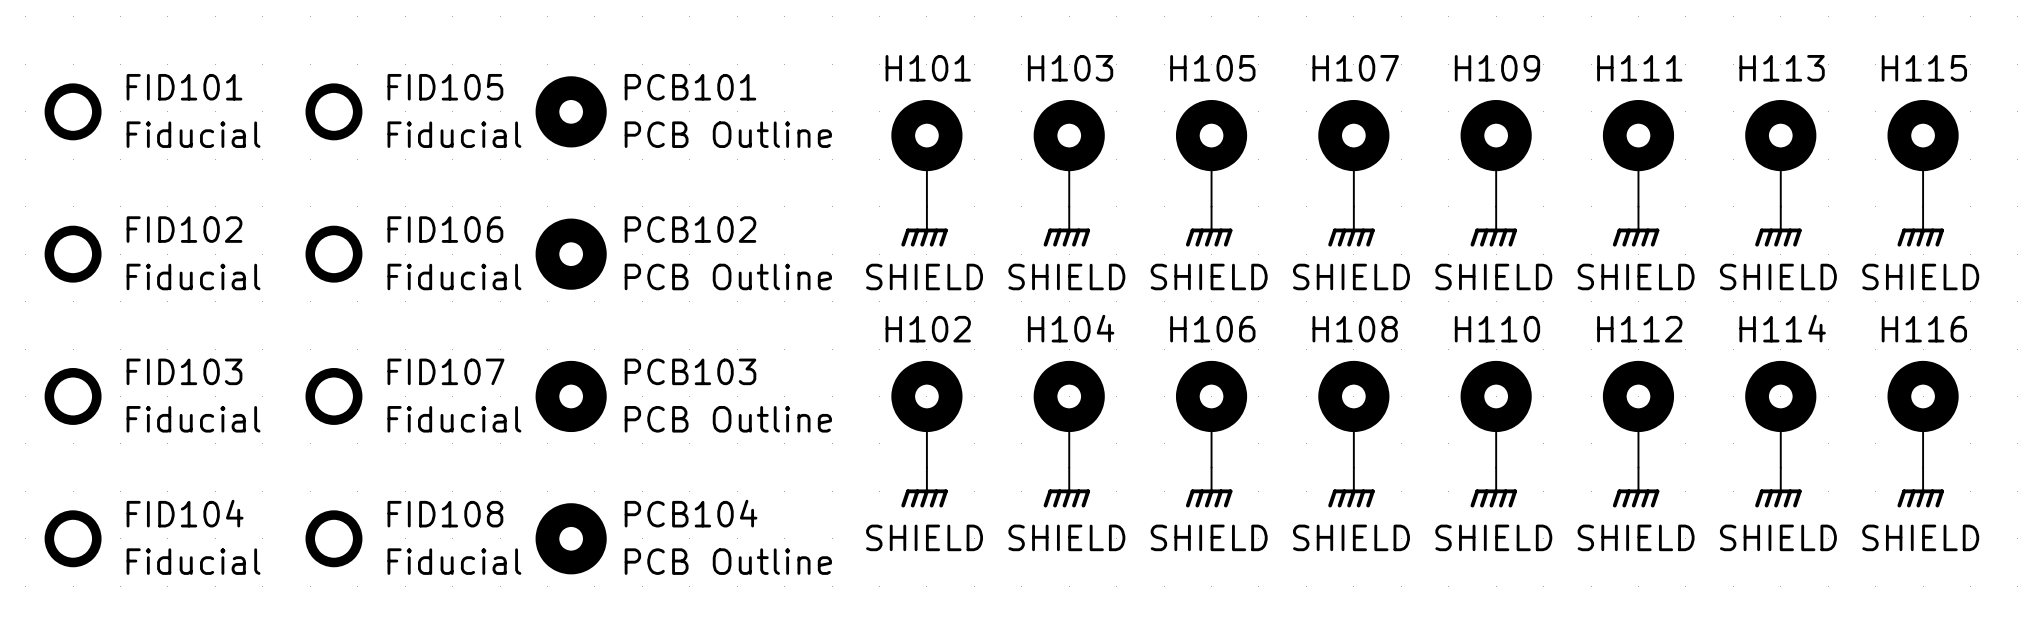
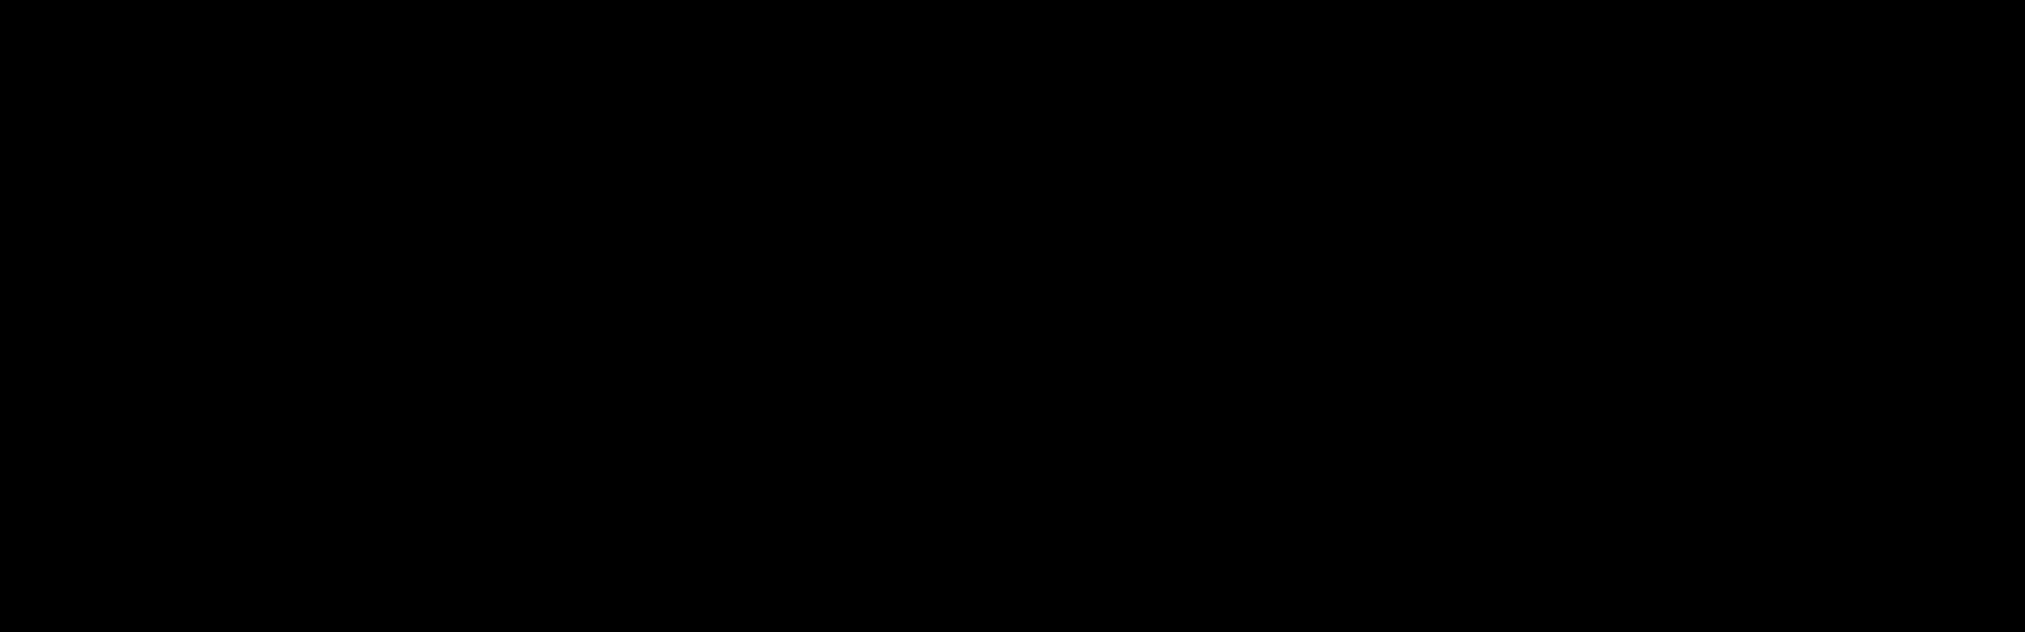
FID101: Fiducial (73, 111) -> none
FID105: Fiducial (333, 111) -> none
PCB101: PCB Outline (571, 111) -> none
H101: (926, 153) -> none
H103: (1069, 153) -> none
H105: (1211, 153) -> none
H107: (1353, 153) -> none
H109: (1496, 153) -> none
H111: (1638, 153) -> none
H113: (1780, 153) -> none
H115: (1923, 153) -> none
power symbol: SHIELD (924, 226) -> none
power symbol: SHIELD (1066, 226) -> none
power symbol: SHIELD (1209, 226) -> none
power symbol: SHIELD (1351, 226) -> none
power symbol: SHIELD (1493, 226) -> none
power symbol: SHIELD (1636, 226) -> none
power symbol: SHIELD (1778, 226) -> none
power symbol: SHIELD (1920, 226) -> none
FID102: Fiducial (73, 254) -> none
FID106: Fiducial (333, 254) -> none
PCB102: PCB Outline (571, 254) -> none
FID103: Fiducial (73, 396) -> none
FID107: Fiducial (333, 396) -> none
PCB103: PCB Outline (571, 396) -> none
H102: (926, 414) -> none
H104: (1069, 414) -> none
H106: (1211, 414) -> none
H108: (1353, 414) -> none
H110: (1496, 414) -> none
H112: (1638, 414) -> none
H114: (1780, 414) -> none
H116: (1923, 414) -> none
power symbol: SHIELD (924, 487) -> none
power symbol: SHIELD (1066, 487) -> none
power symbol: SHIELD (1209, 487) -> none
power symbol: SHIELD (1351, 487) -> none
power symbol: SHIELD (1493, 487) -> none
power symbol: SHIELD (1636, 487) -> none
power symbol: SHIELD (1778, 487) -> none
power symbol: SHIELD (1920, 487) -> none
FID104: Fiducial (73, 538) -> none
FID108: Fiducial (333, 538) -> none
PCB104: PCB Outline (571, 538) -> none

